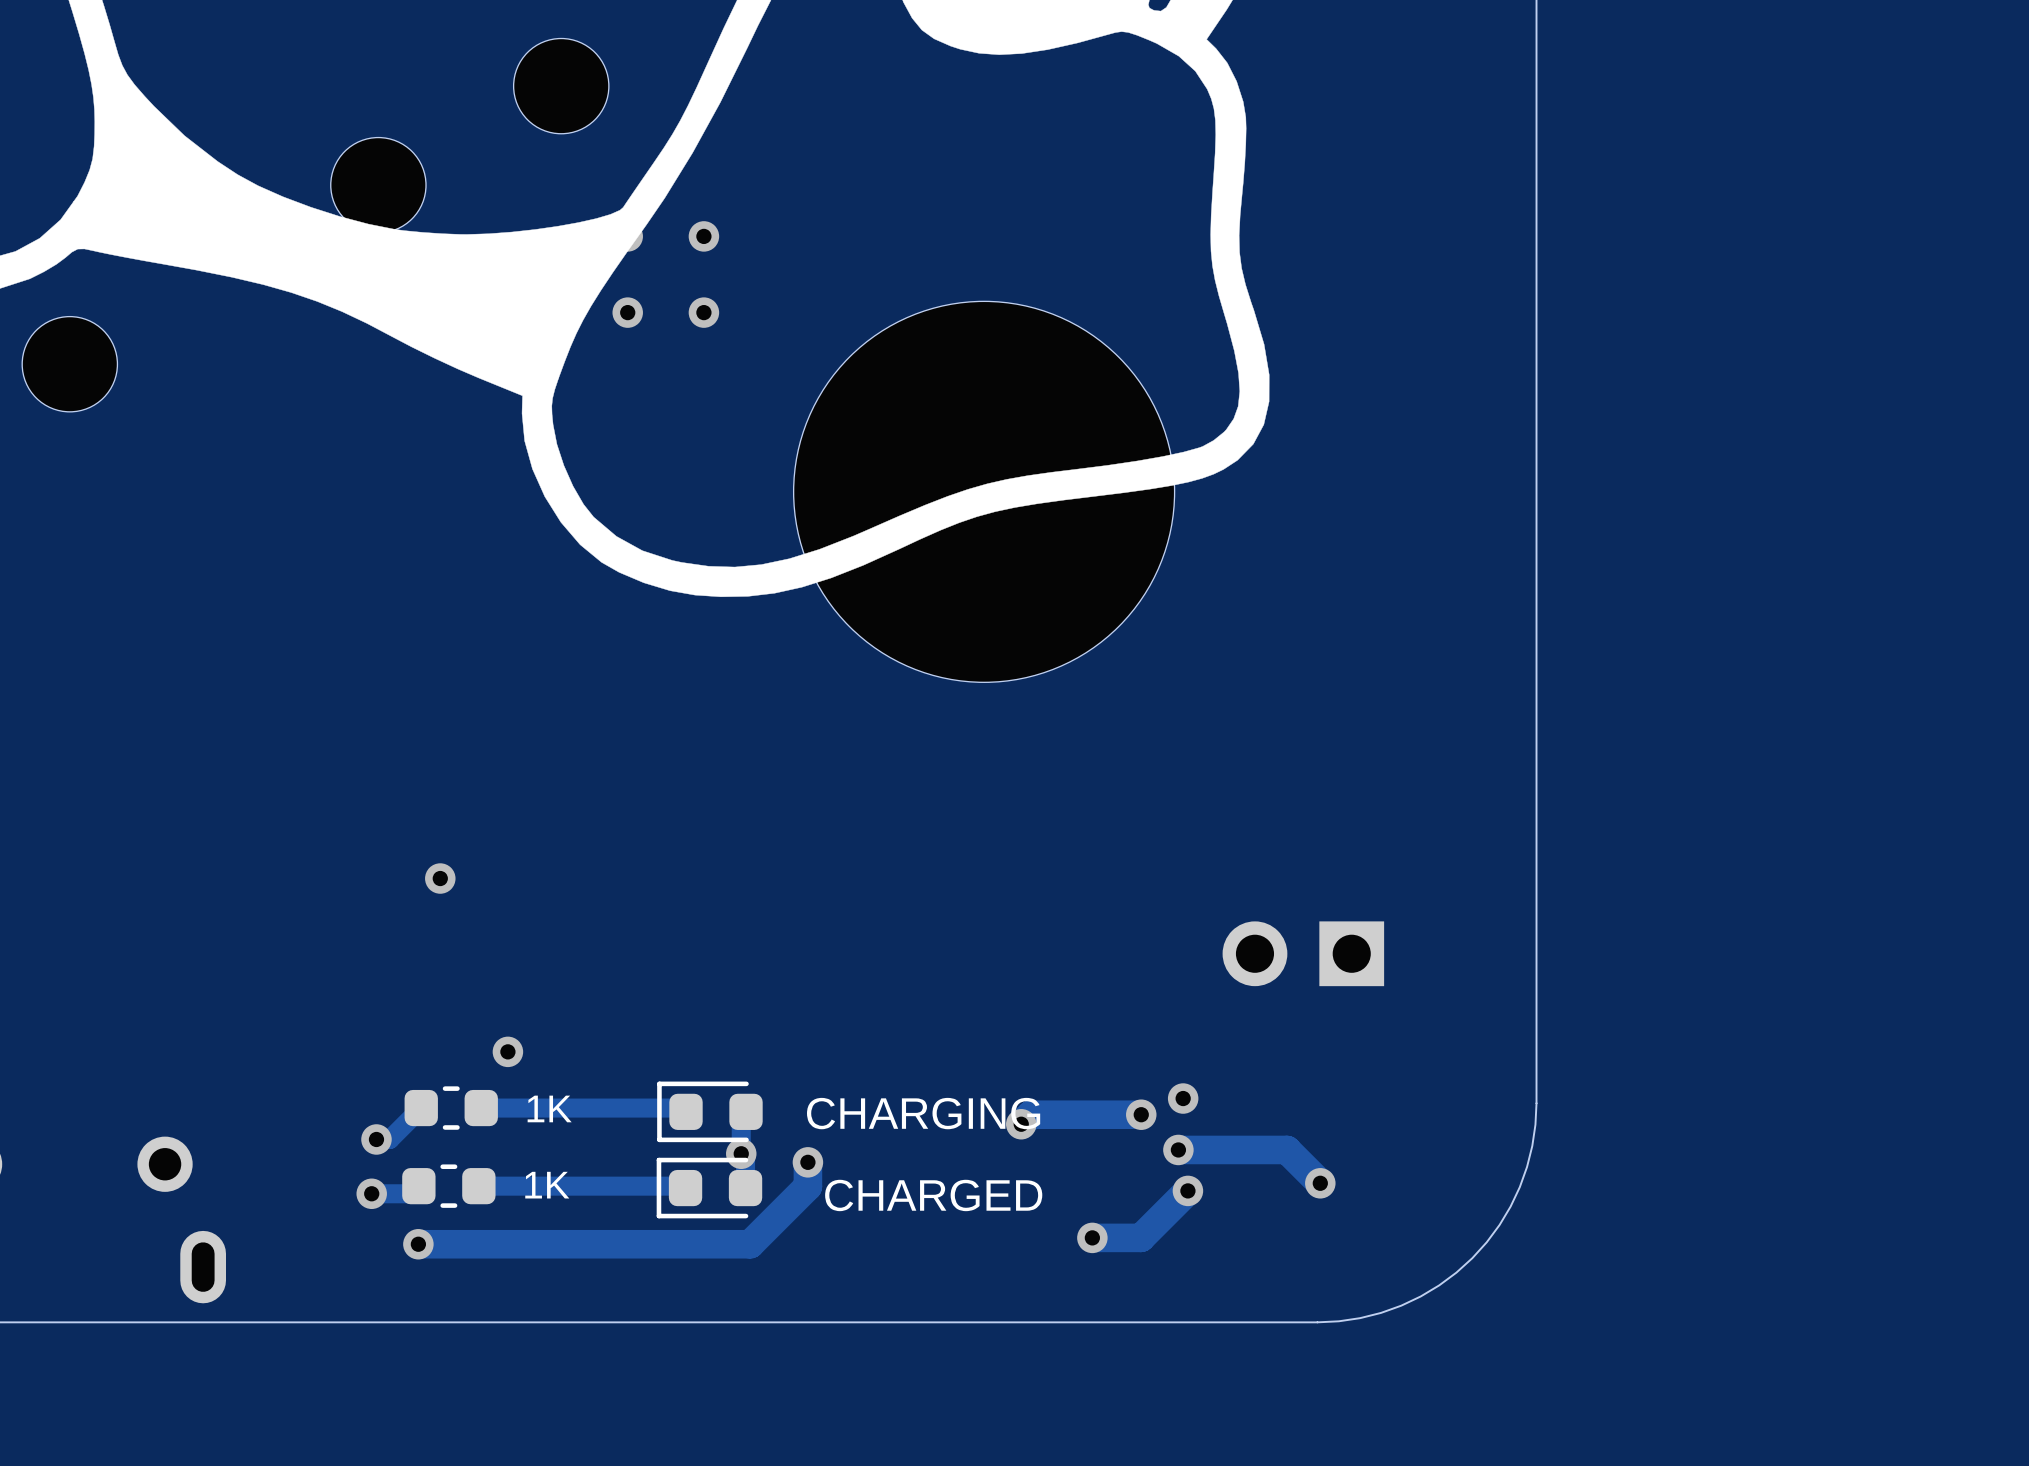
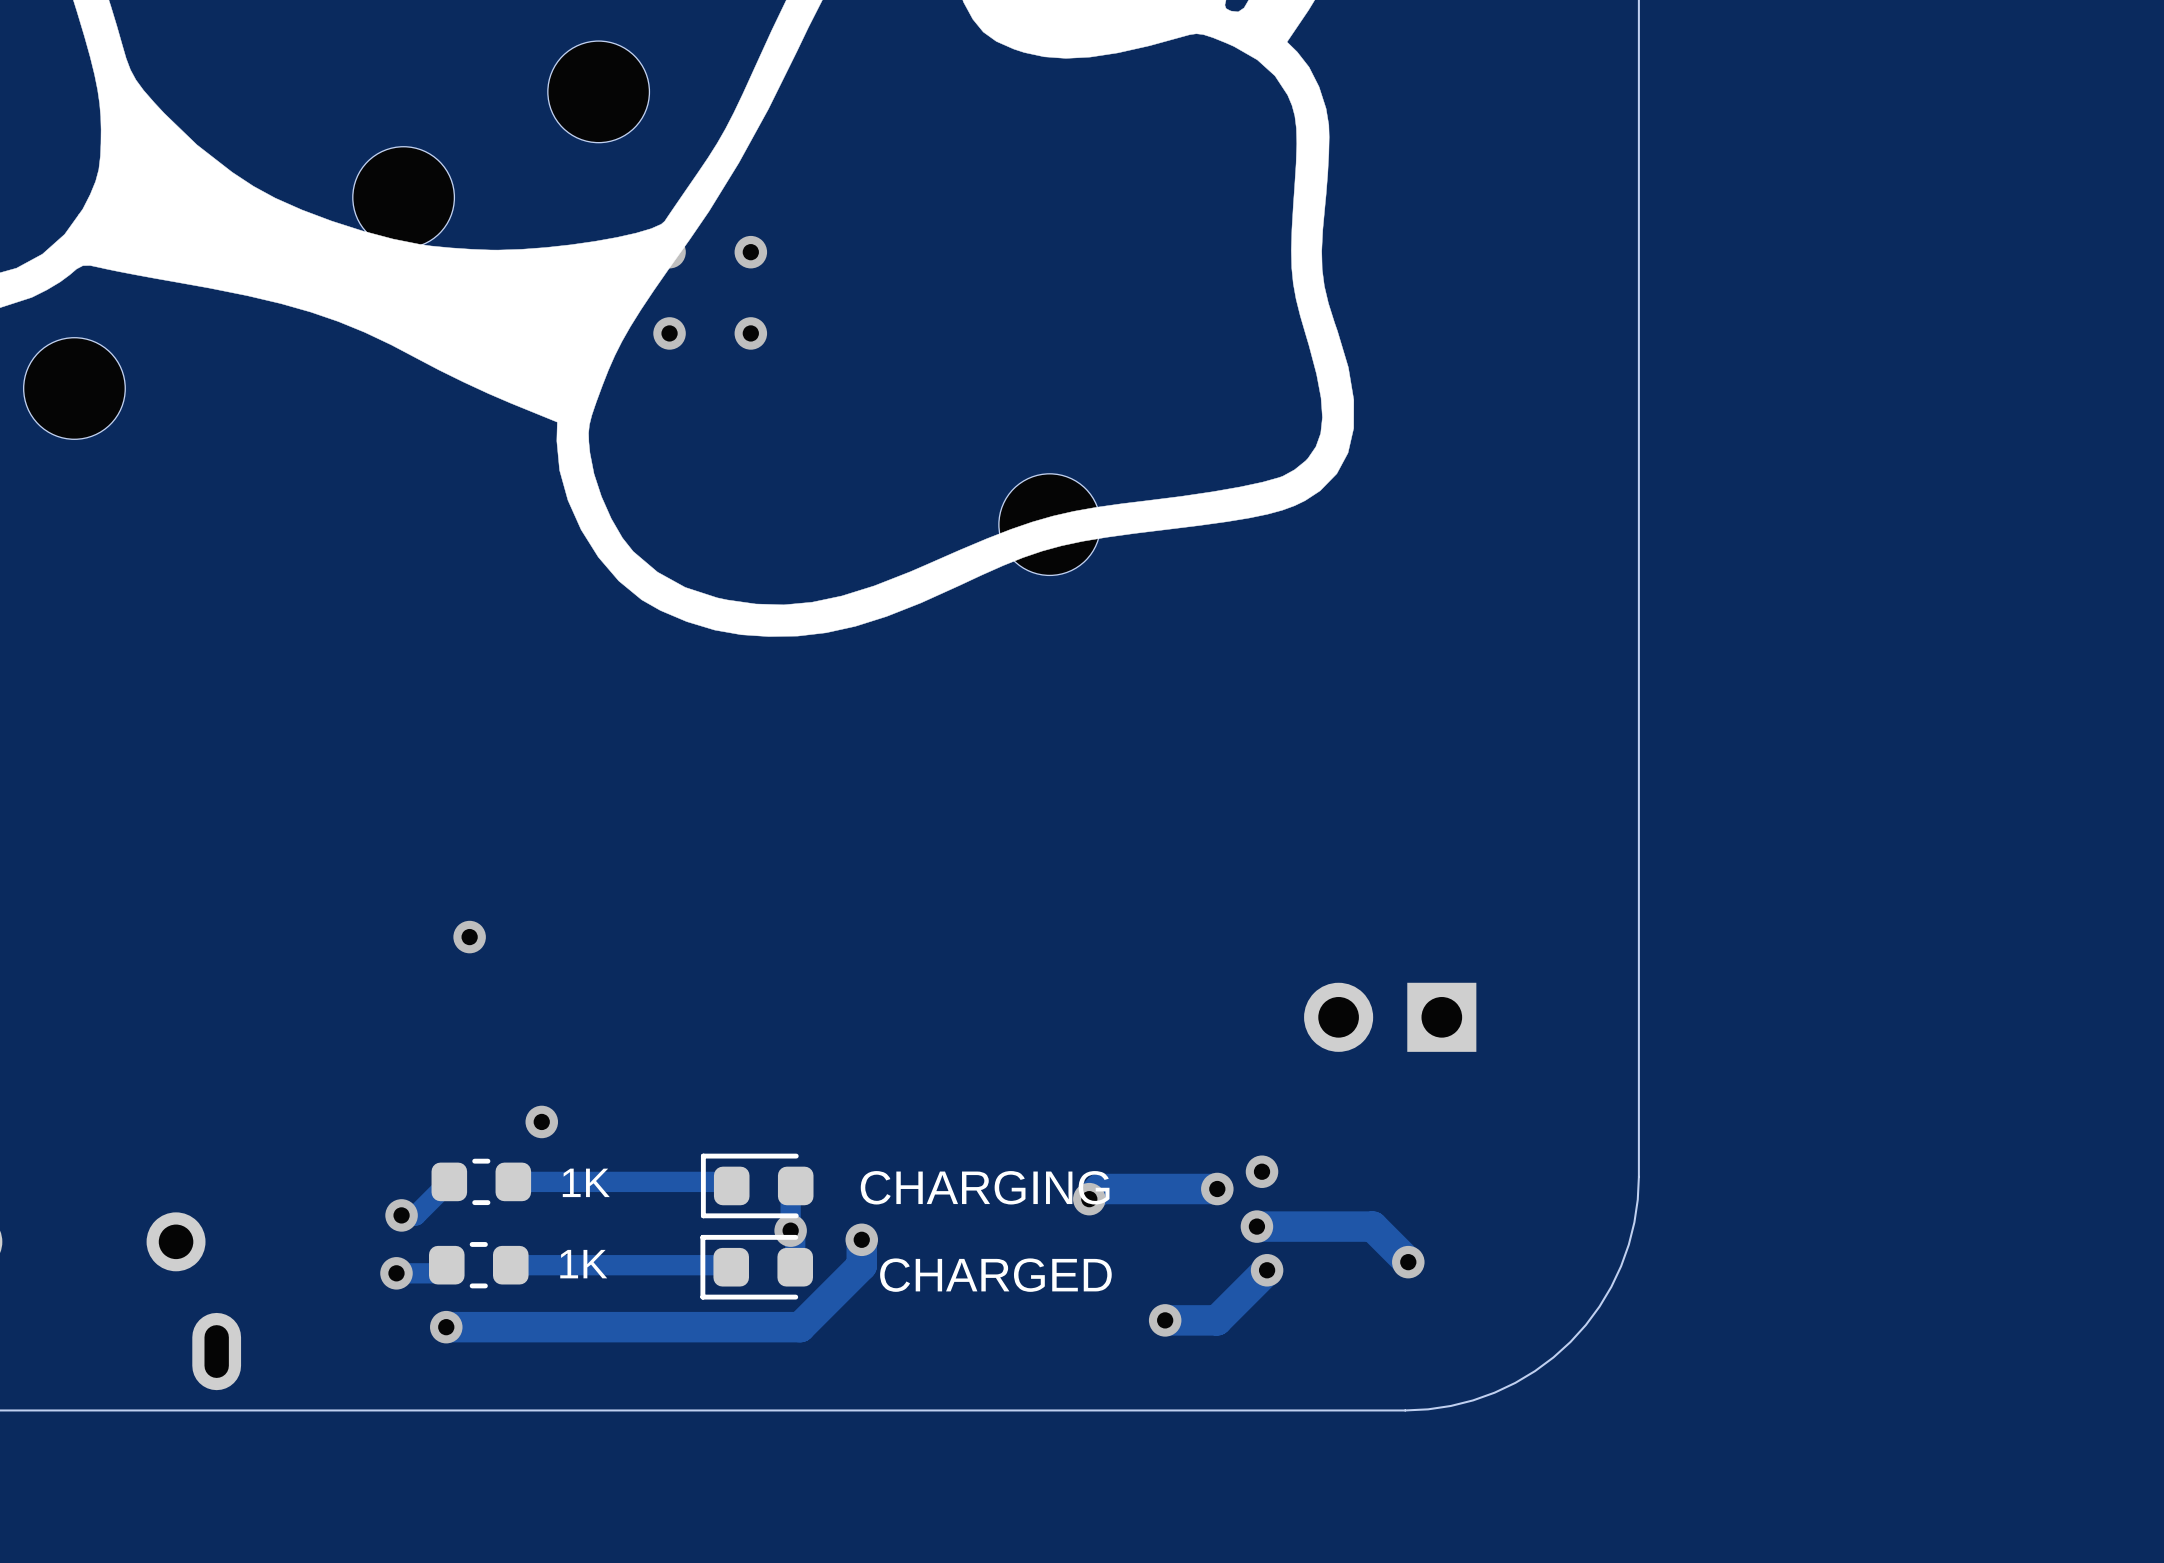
part footprint: [793, 301, 1175, 683] -> [998, 473, 1101, 576]

